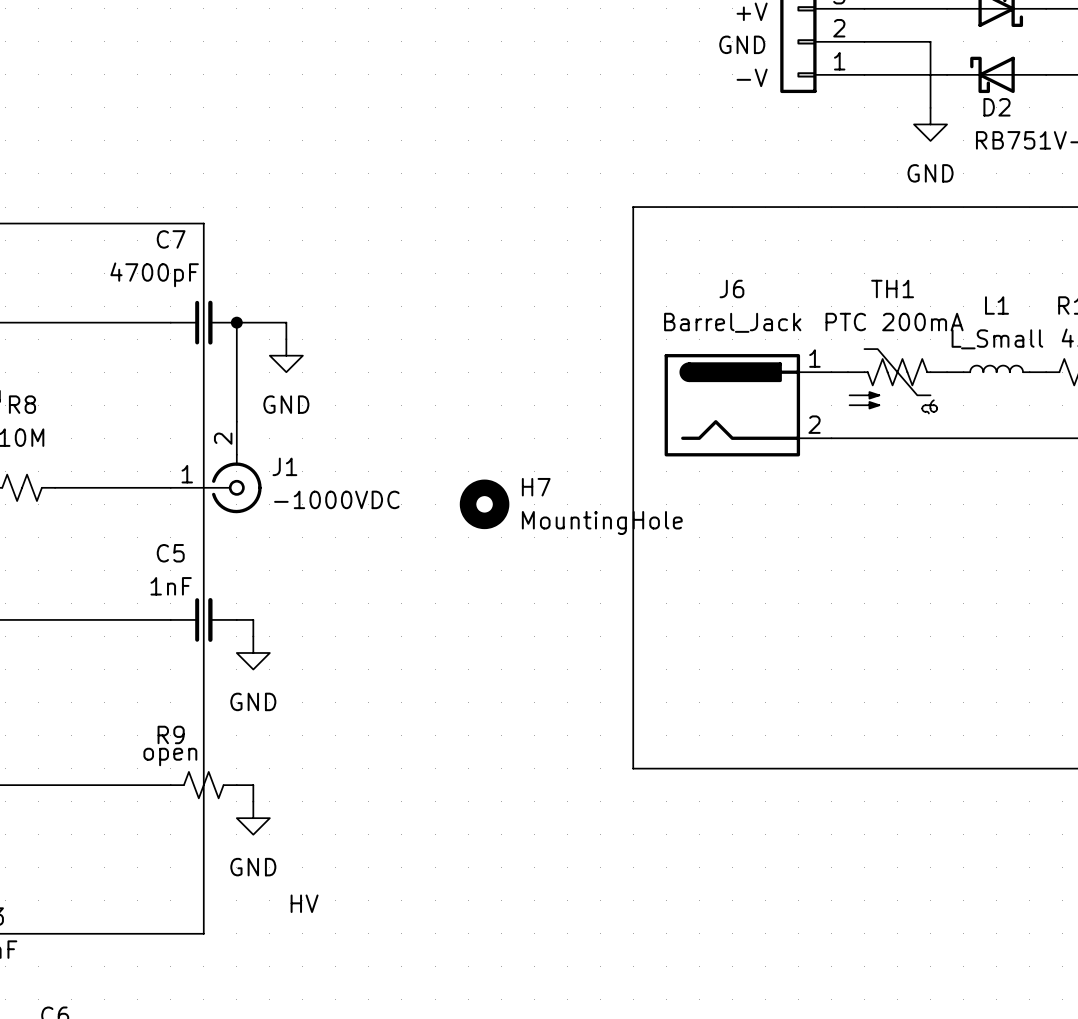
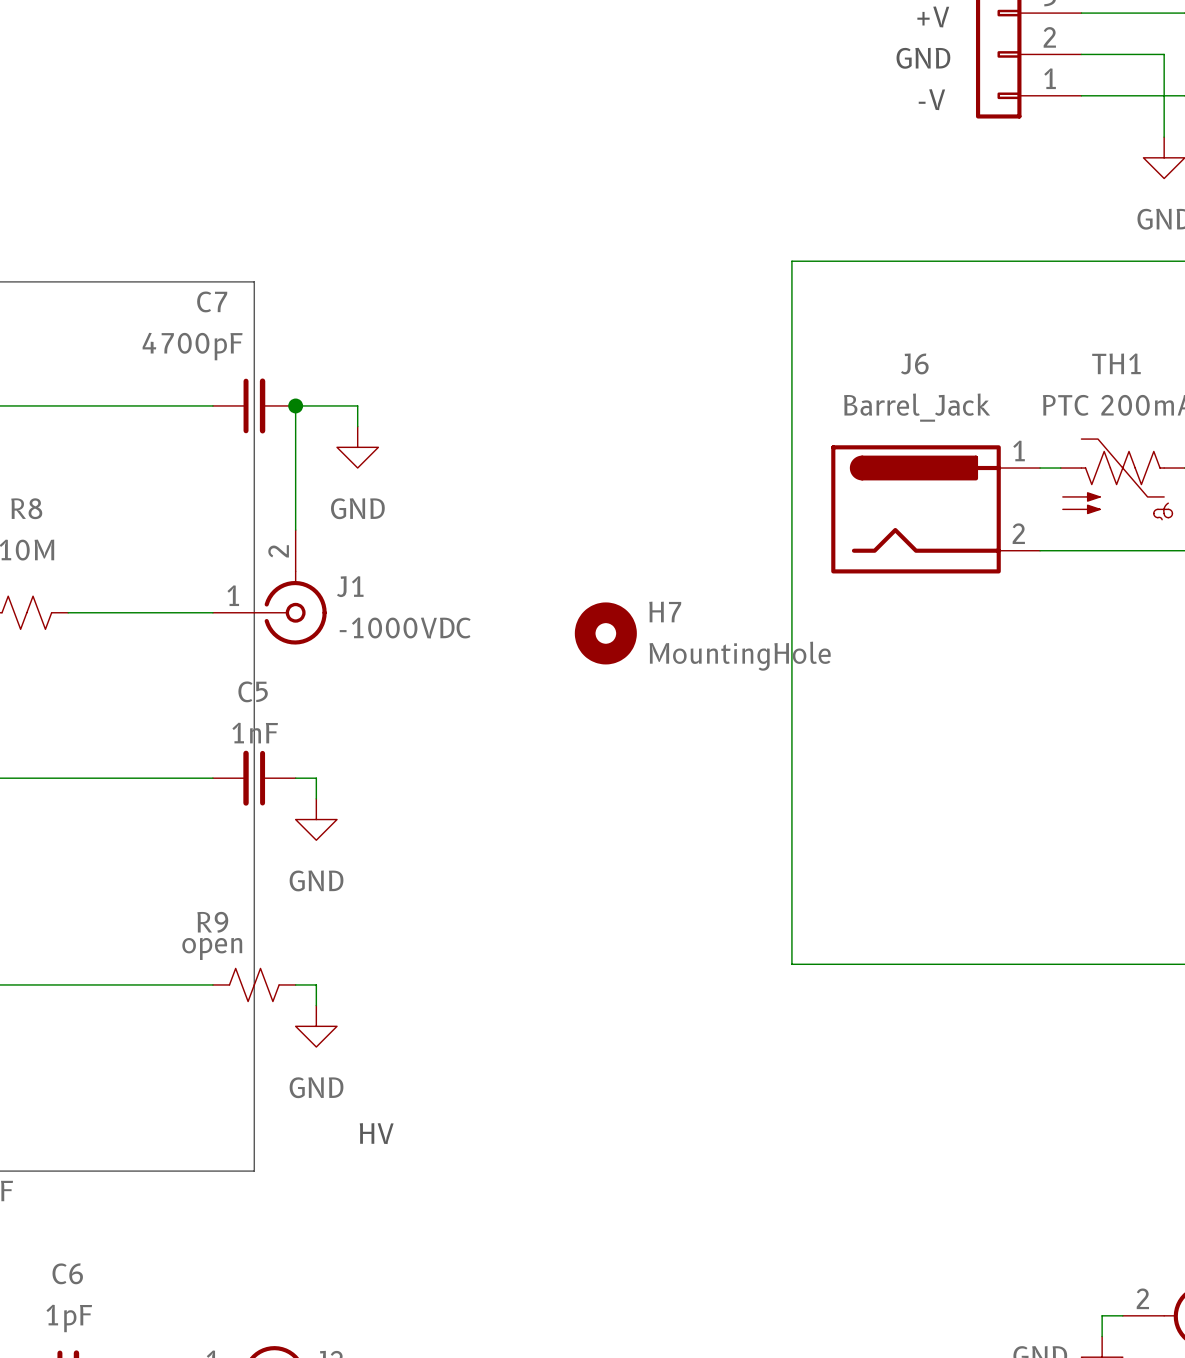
C5 name position: C5 (170, 553) -> C5 (253, 691)
C5 value position: 1nF (171, 586) -> 1nF (255, 733)
C5 rotation: 0° (203, 619) -> 180° (254, 778)

